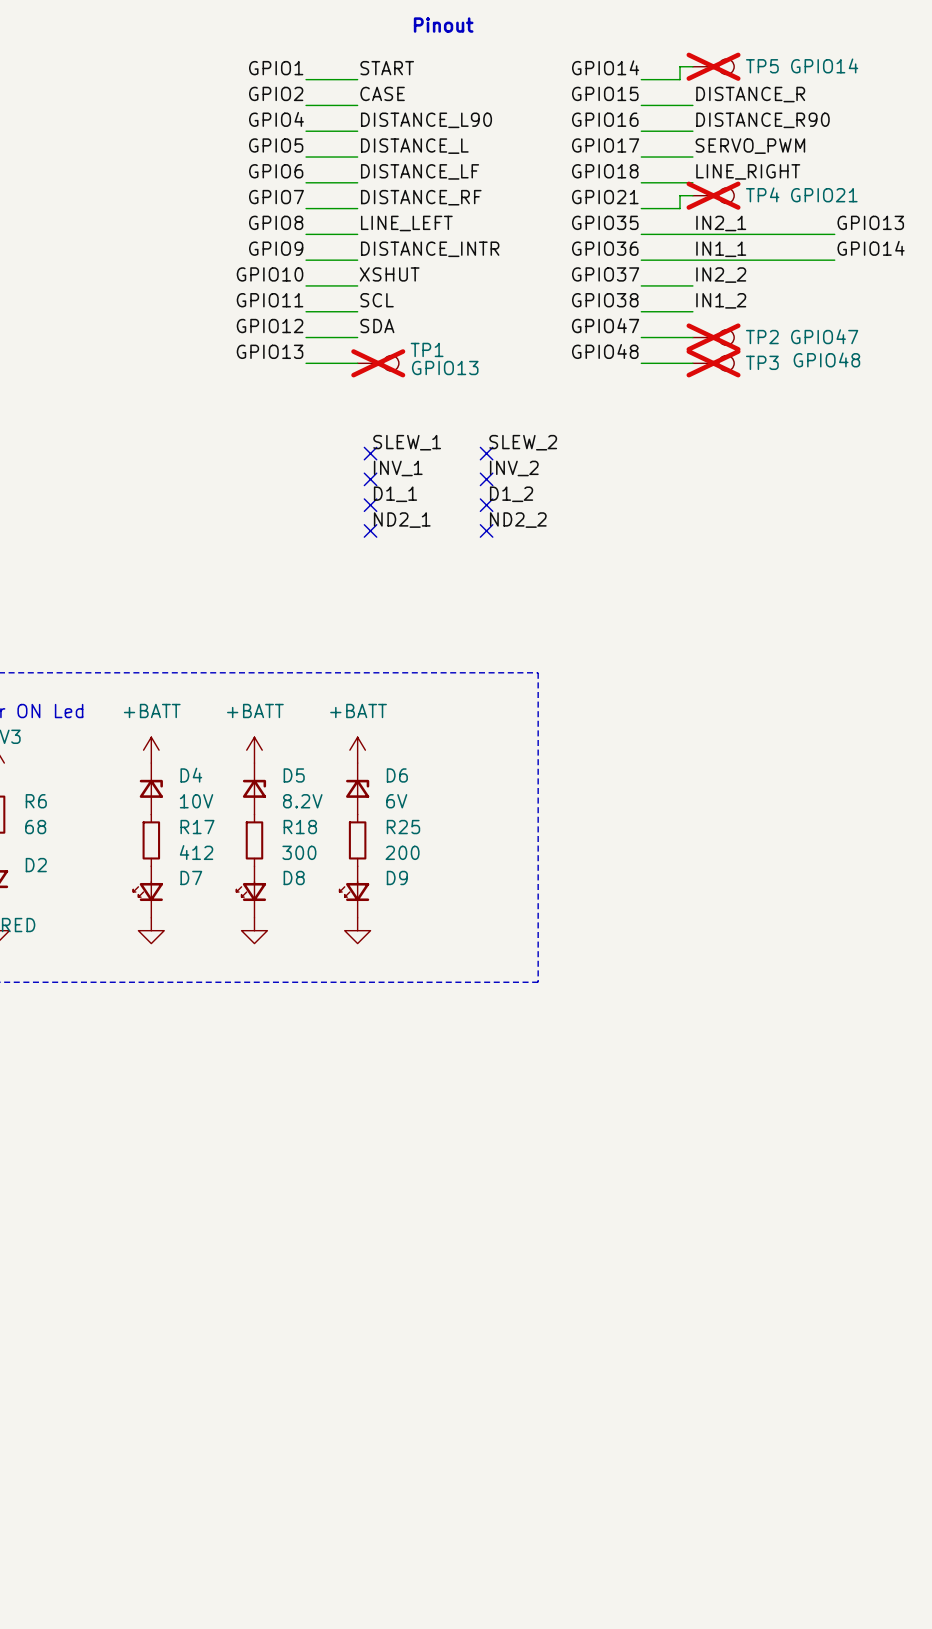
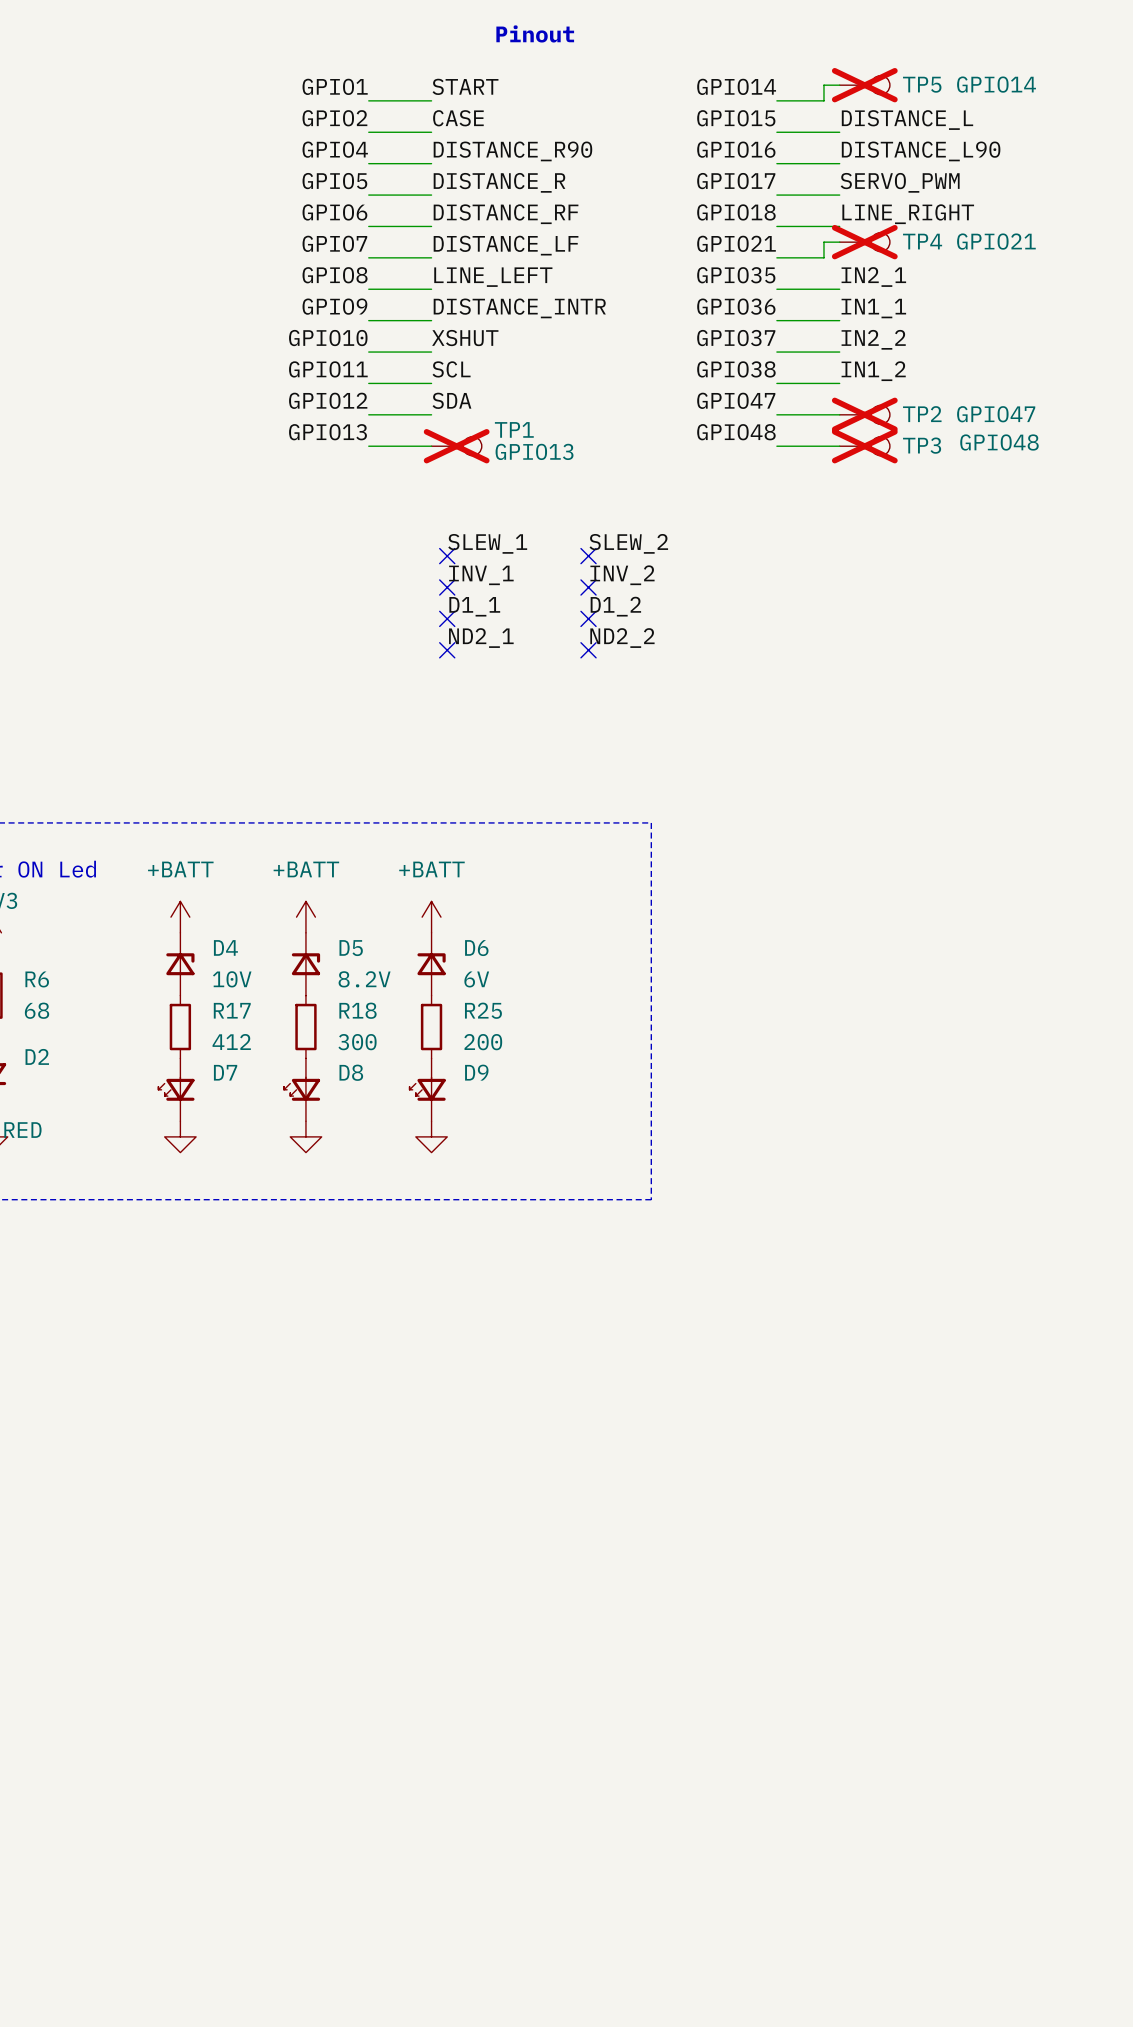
label: DISTANCE_R (750, 94) -> DISTANCE_L (907, 120)
label: DISTANCE_L90 (426, 120) -> DISTANCE_R90 (512, 151)
label: DISTANCE_R90 (762, 120) -> DISTANCE_L90 (921, 151)
label: DISTANCE_L (414, 146) -> DISTANCE_R (499, 182)
label: DISTANCE_LF (420, 171) -> DISTANCE_RF (506, 214)
label: DISTANCE_RF (421, 197) -> DISTANCE_LF (506, 245)
label: GPIO13 (870, 222) -> none
wire: (692, 234) (834, 234) -> none
label: GPIO14 (871, 248) -> none
wire: (692, 260) (834, 260) -> none

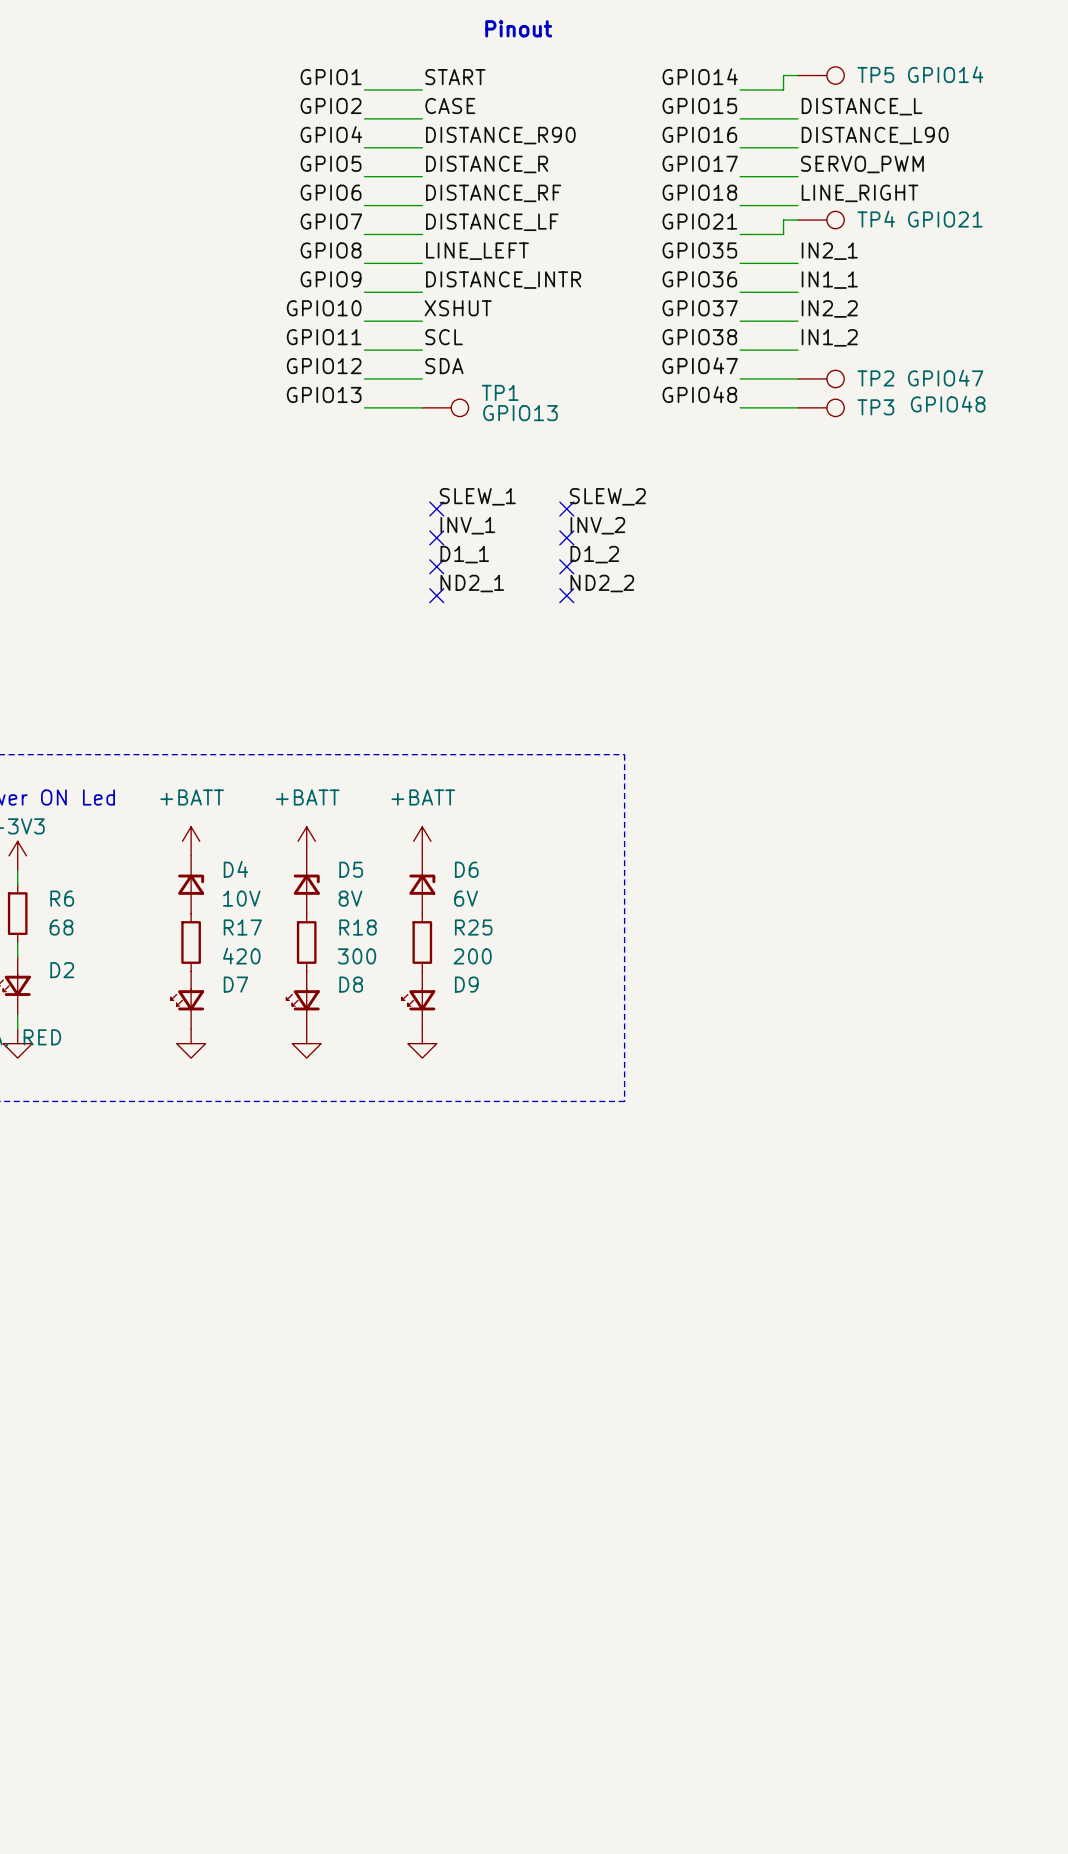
TP5 do-not-place cross: (864, 85) -> none
TP4 do-not-place cross: (864, 242) -> none
TP2 do-not-place cross: (864, 414) -> none
TP1 do-not-place cross: (456, 446) -> none
TP3 do-not-place cross: (864, 446) -> none
D5 value: 8.2V (364, 979) -> 8V (350, 898)
R17 value: 412 (231, 1042) -> 420 (241, 956)

